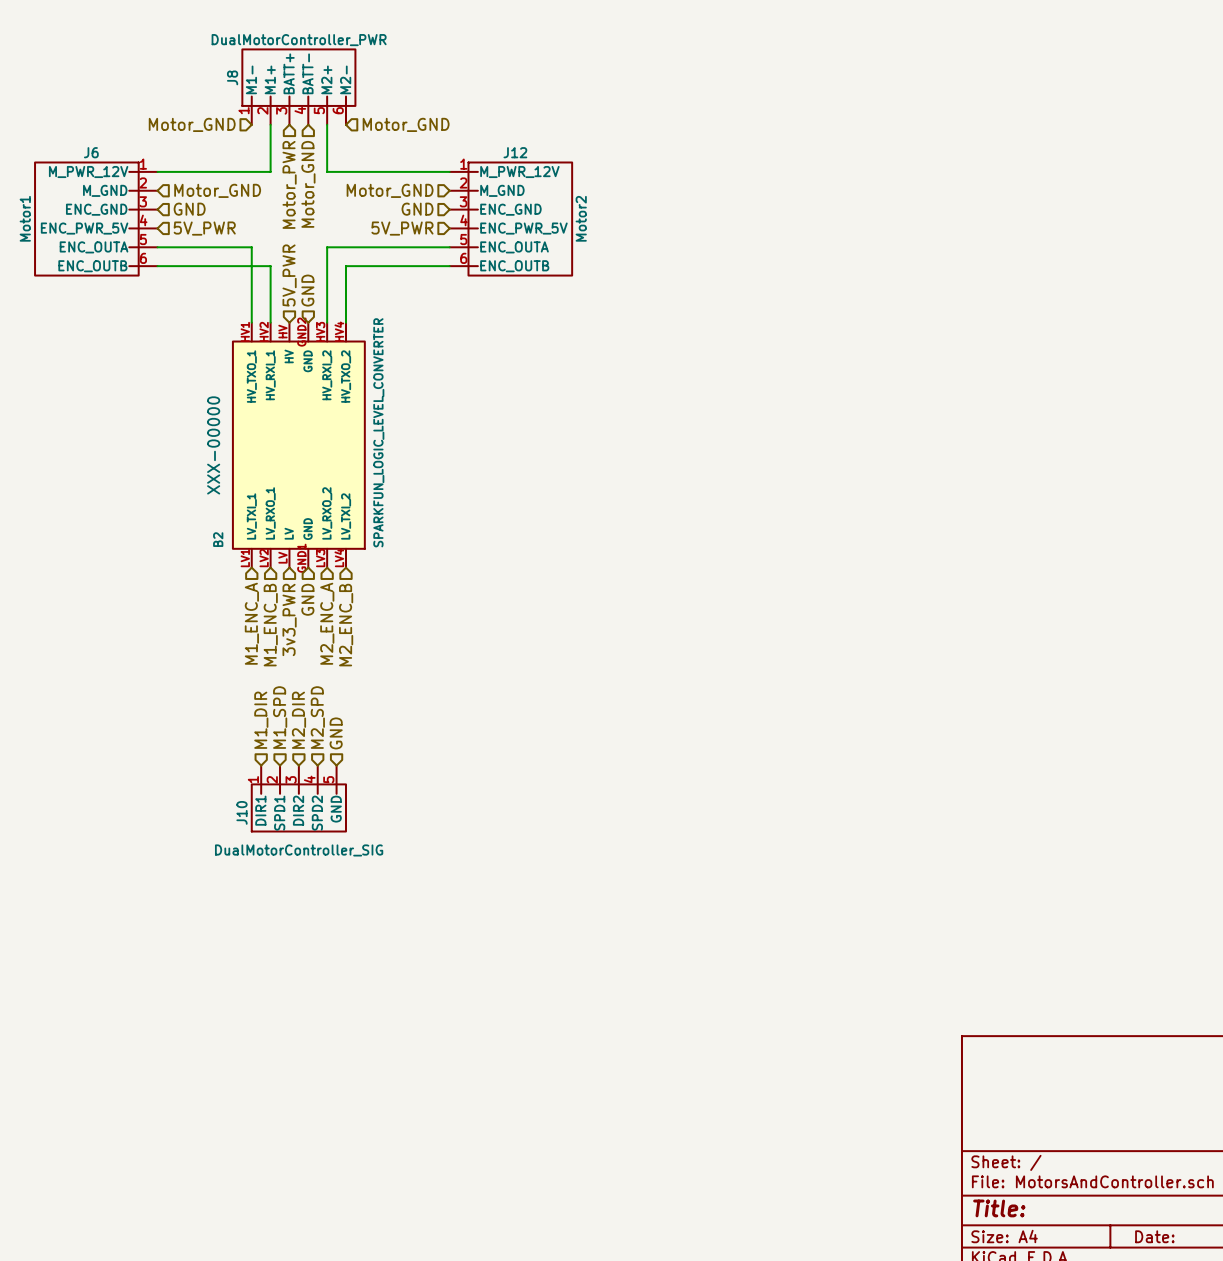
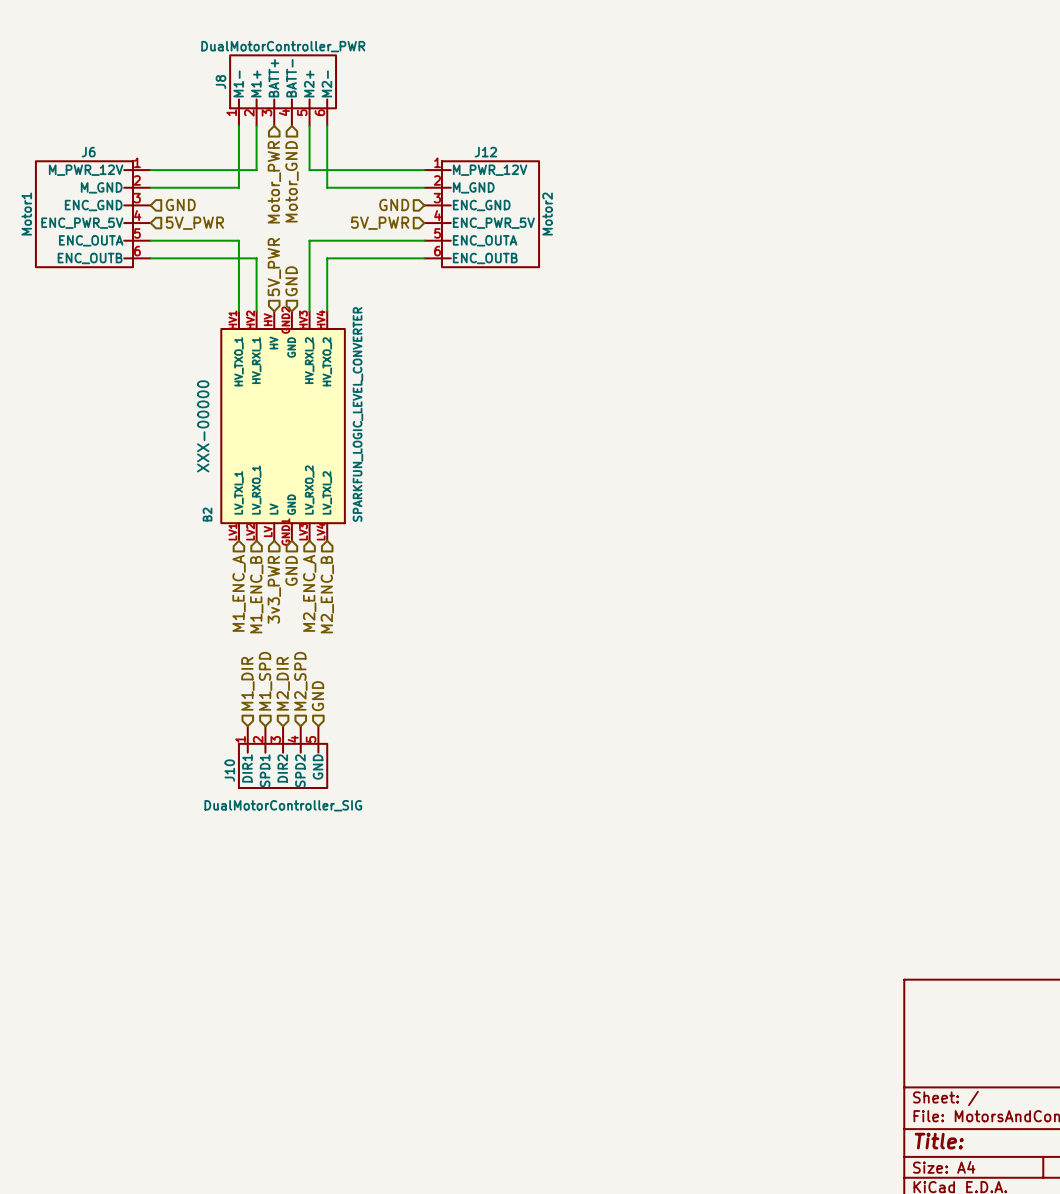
hierarchical label: Motor_GND (192, 124) -> none
wire: none -> (238, 125) (238, 187) (150, 187)
wire: none -> (327, 125) (327, 187) (424, 187)
hierarchical label: Motor_GND (406, 124) -> none
hierarchical label: Motor_GND (217, 190) -> none
hierarchical label: Motor_GND (390, 190) -> none

